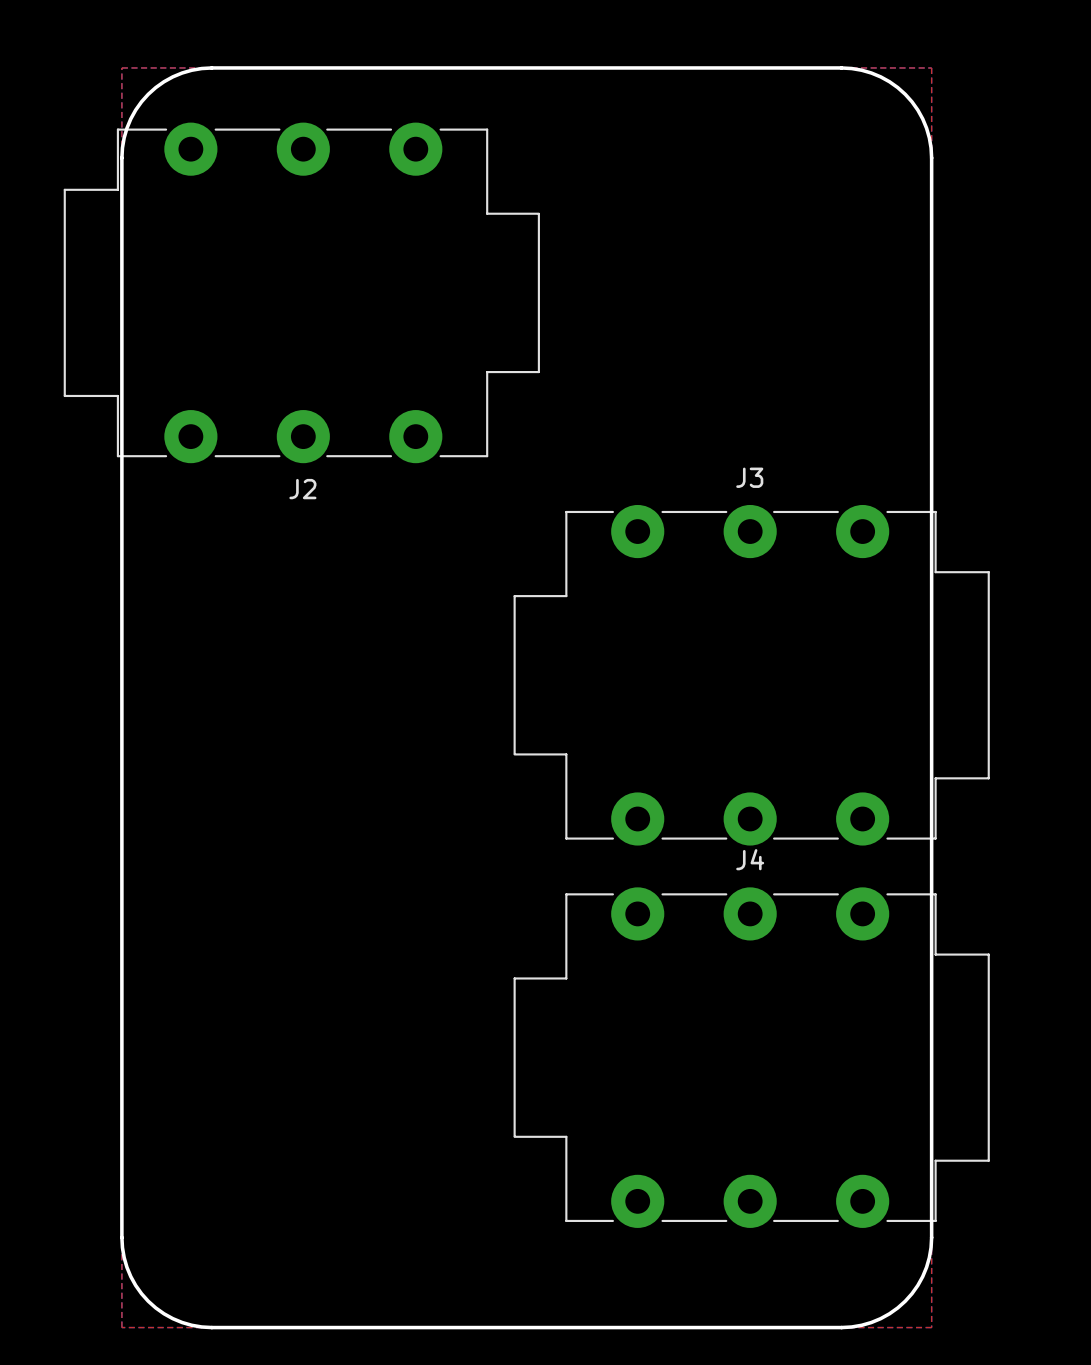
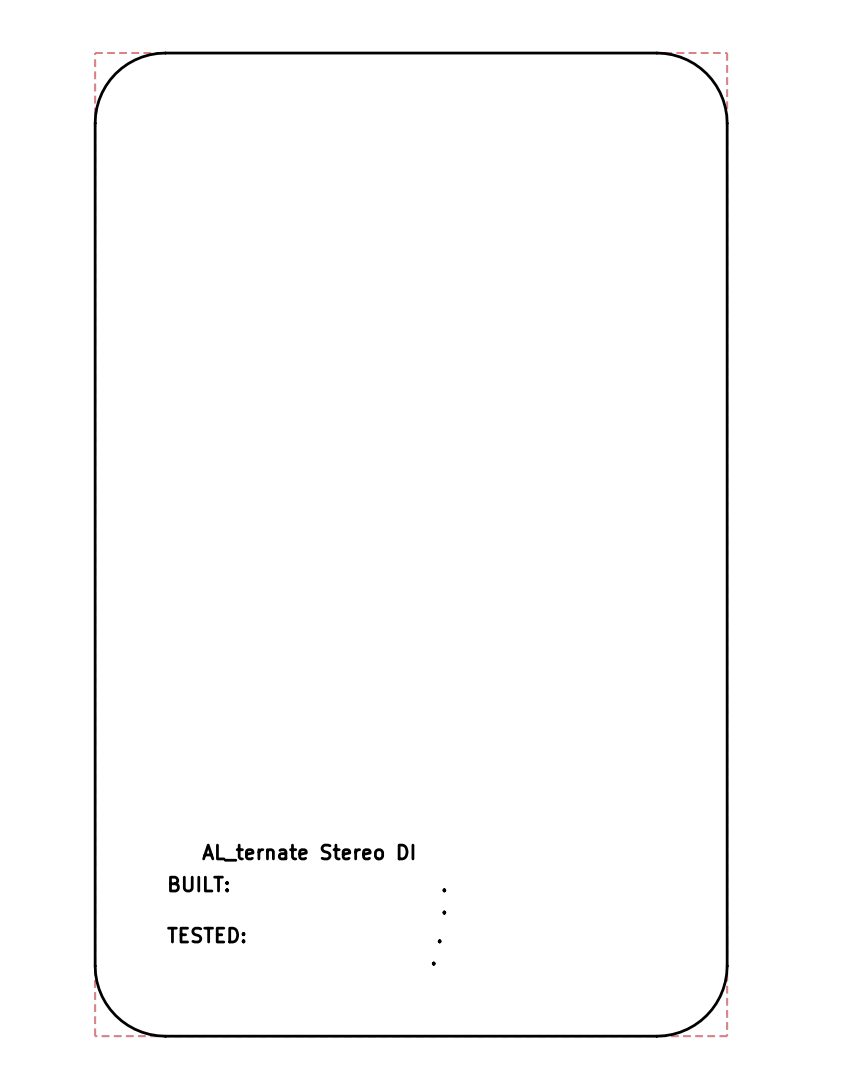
J2: (301, 292) -> none
J3: (751, 675) -> none
J4: (751, 1057) -> none
text: none -> AL_ternate Stereo DI (308, 852)
text: none -> BUILT: . (307, 884)
text: none -> . (444, 912)
text: none -> TESTED: . (304, 935)
text: none -> . (433, 963)

